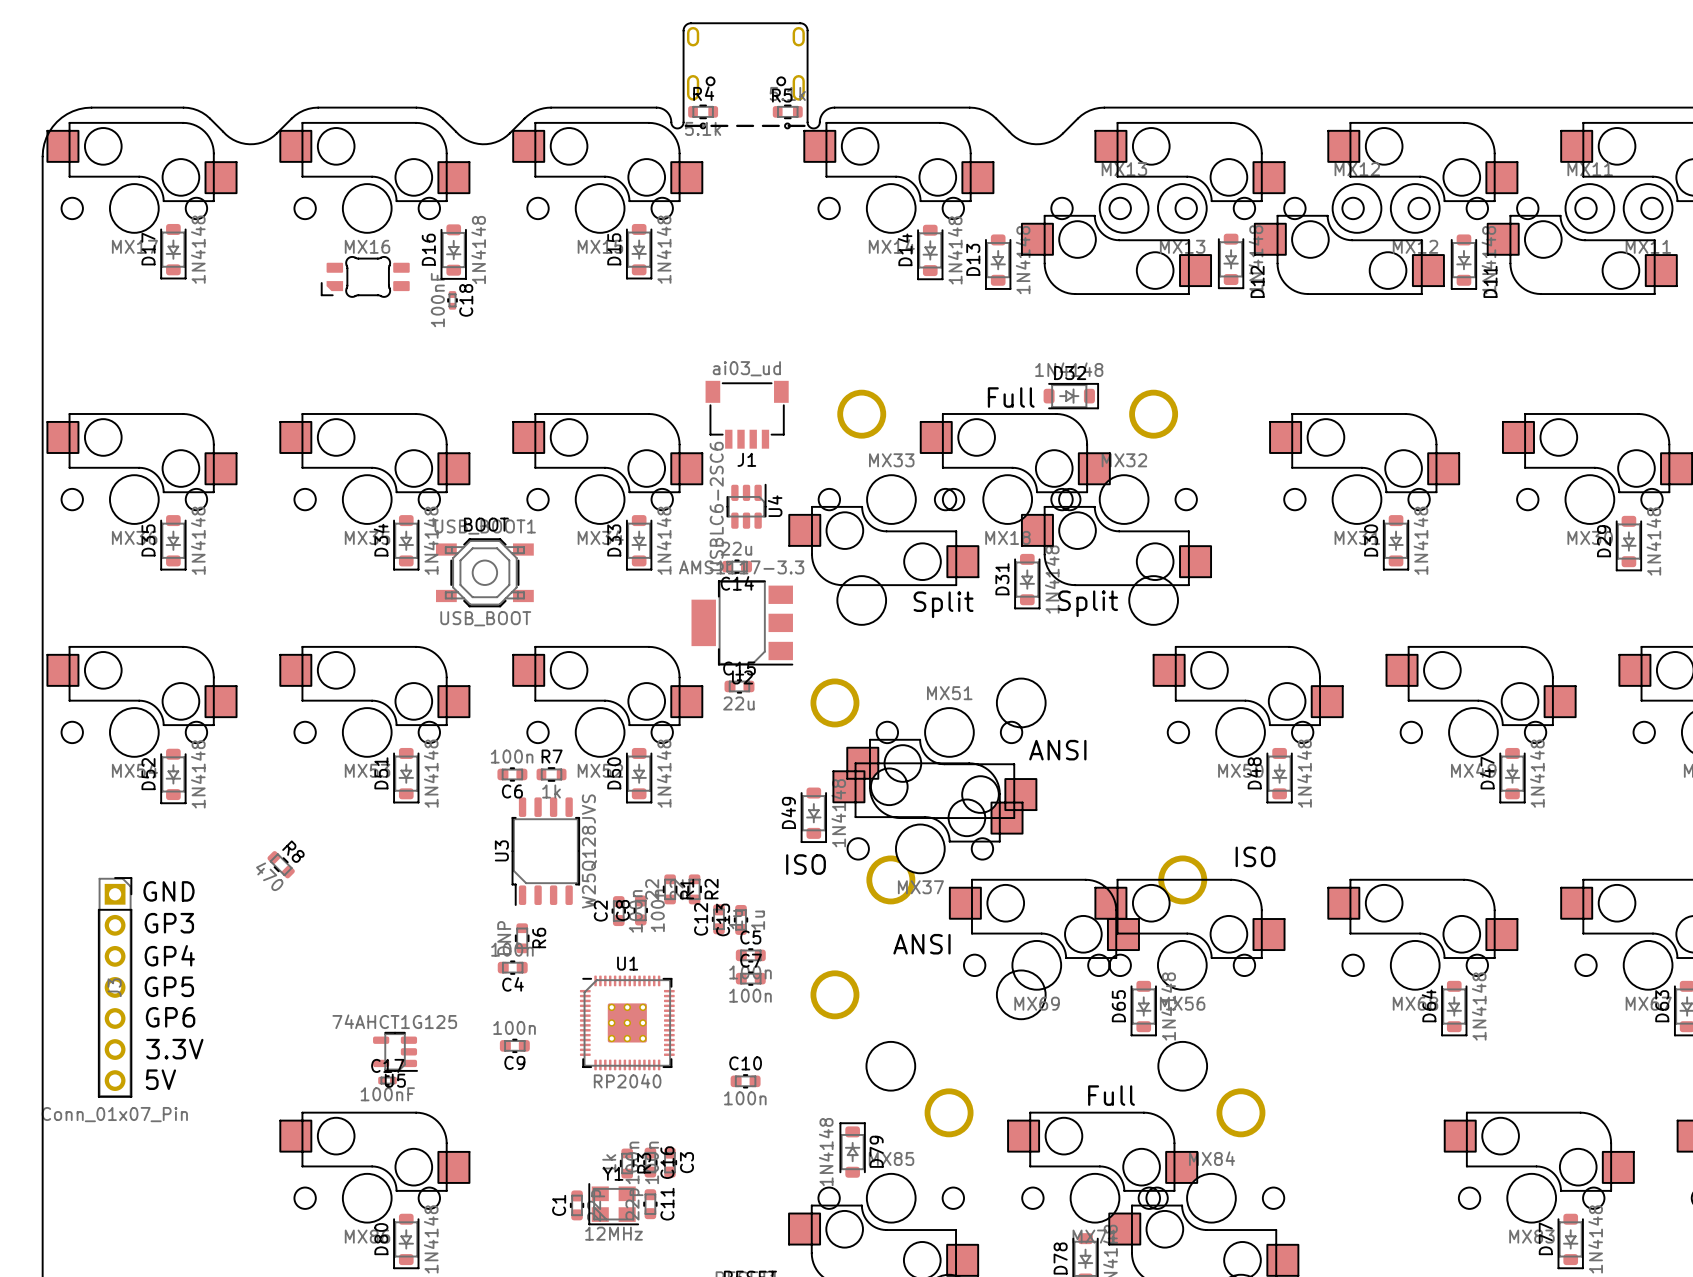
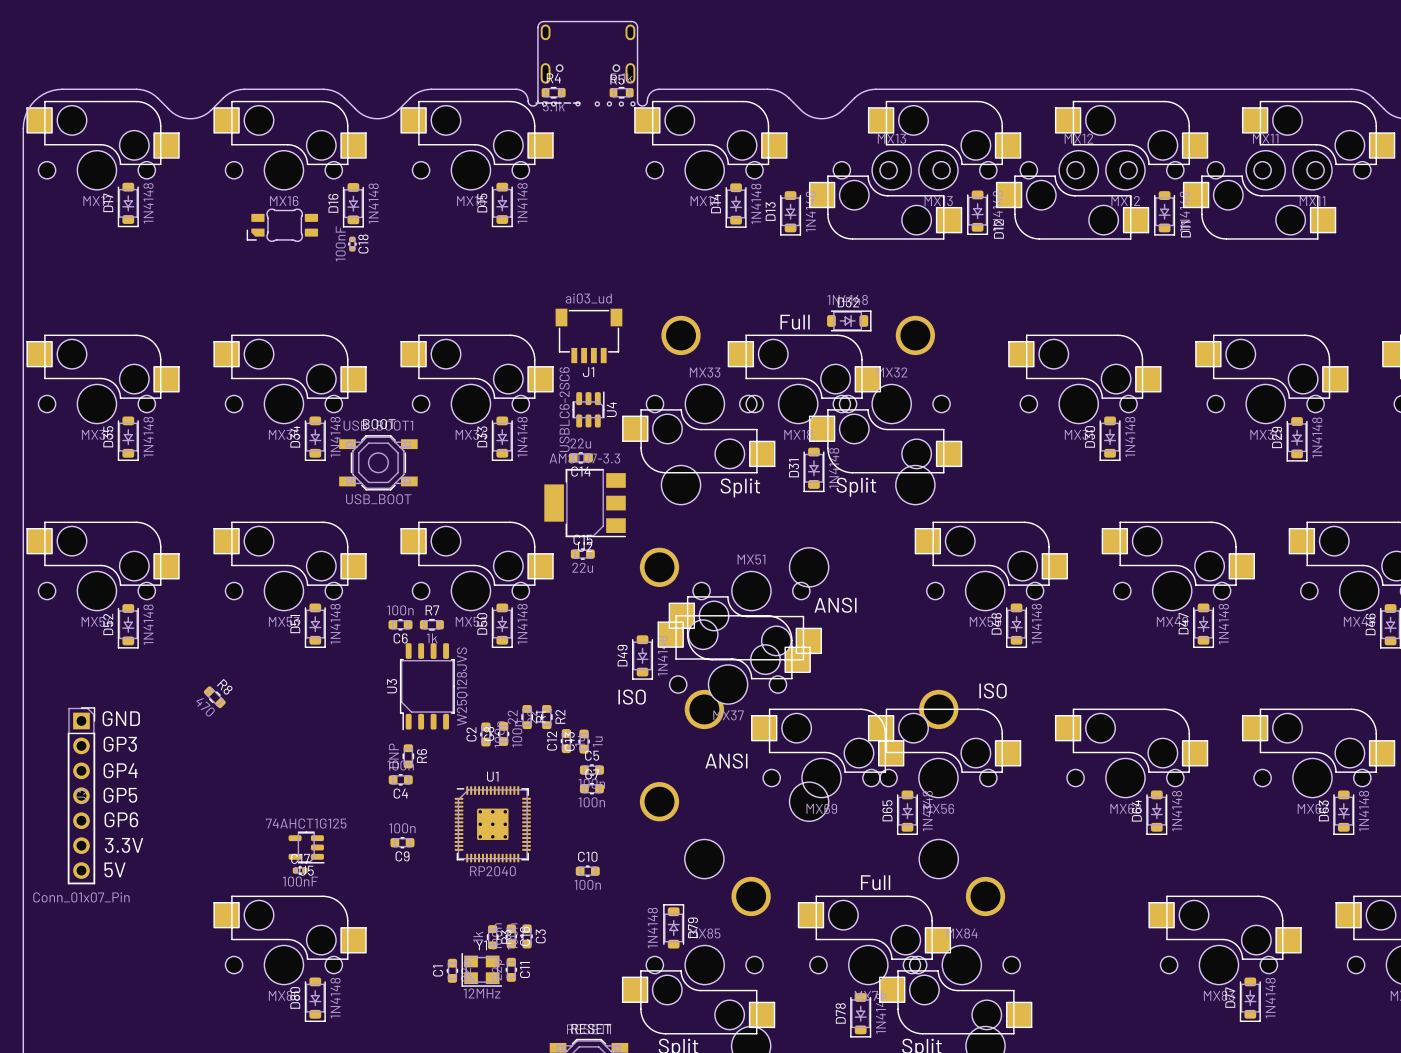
part: none -> (544, 103)
part: none -> (577, 103)
part: none -> (597, 103)
part: none -> (609, 103)
part: none -> (632, 103)

